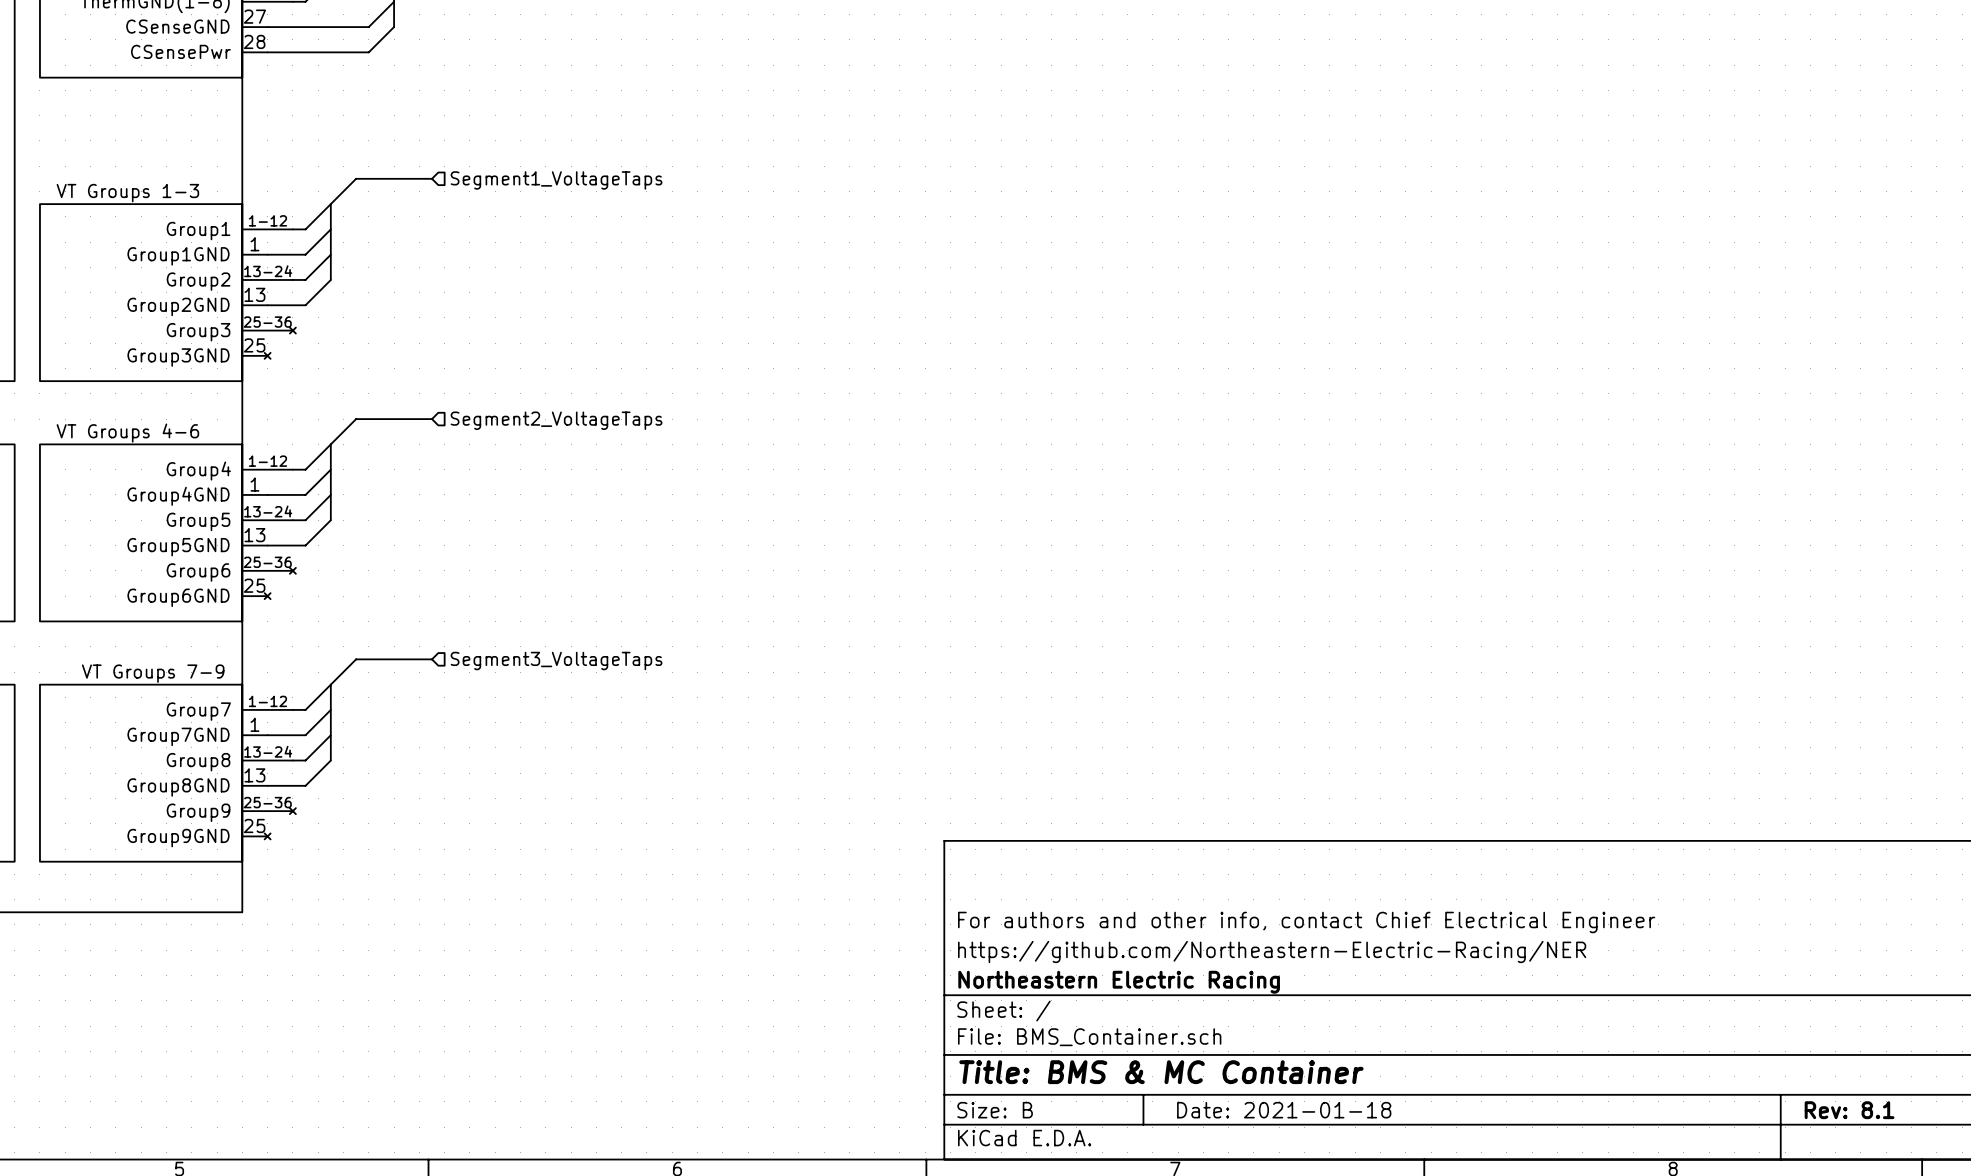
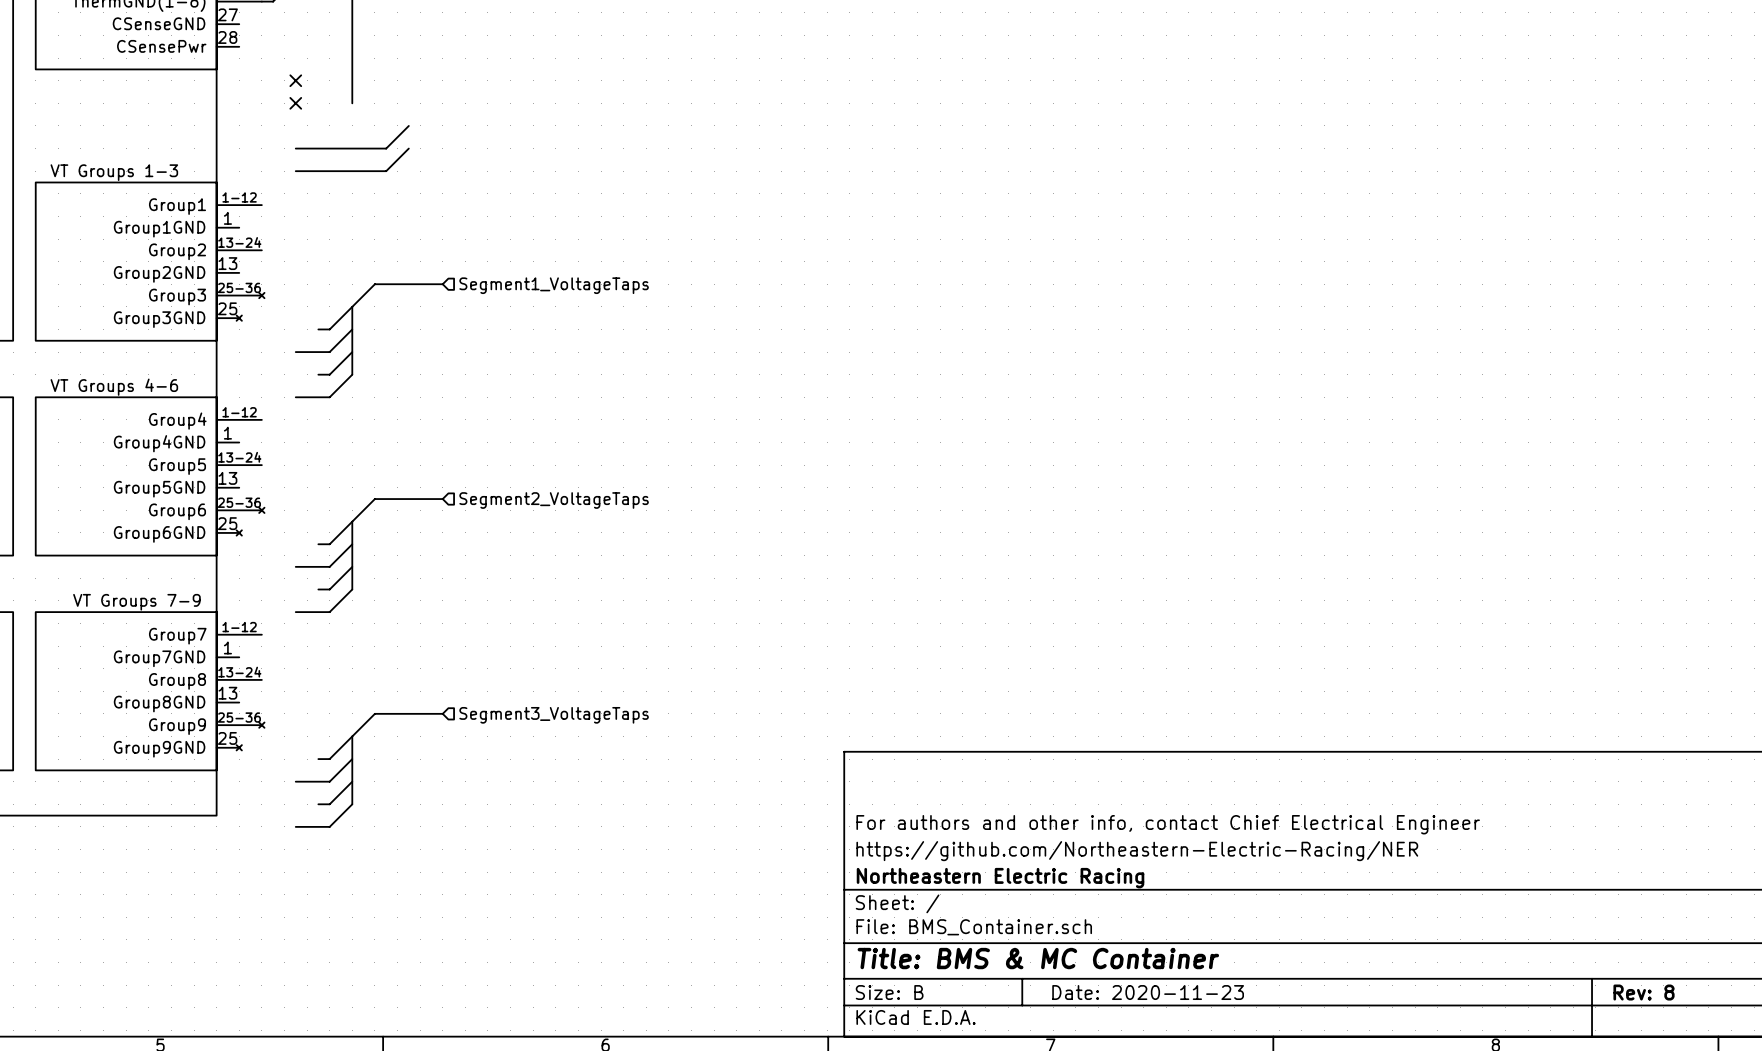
wire: (394, 1) (368, 27) (267, 27) -> (408, 125) (386, 148) (295, 148)
wire: (394, 27) (368, 52) (267, 52) -> (408, 148) (386, 171) (295, 171)
bus: none -> (352, 24) (352, 103)
no-connect mark: none -> (295, 80)
no-connect mark: none -> (295, 103)
bus: (432, 178) (356, 178) (330, 204) (330, 279) -> (442, 284) (374, 284) (352, 306) (352, 374)
hierarchical label position: Segment1_VoltageTaps (556, 180) -> Segment1_VoltageTaps (554, 285)
wire: (330, 204) (305, 229) (292, 229) -> (352, 306) (329, 329) (318, 329)
wire: (330, 229) (305, 254) (267, 254) -> (352, 329) (329, 352) (295, 352)
wire: (330, 254) (305, 279) (292, 279) -> (352, 352) (329, 374) (318, 374)
wire: (330, 279) (305, 305) (267, 305) -> none
bus: (432, 419) (356, 419) (330, 444) (330, 520) -> (442, 499) (374, 499) (352, 521) (352, 589)
hierarchical label position: Segment2_VoltageTaps (556, 420) -> Segment2_VoltageTaps (554, 500)
wire: (330, 444) (305, 469) (292, 469) -> (295, 397) (329, 397) (352, 374)
wire: (330, 469) (305, 494) (267, 494) -> (352, 544) (329, 566) (295, 566)
wire: (330, 494) (305, 520) (292, 520) -> (352, 566) (329, 589) (318, 589)
wire: (330, 520) (305, 545) (267, 545) -> none
wire: none -> (352, 521) (329, 544) (318, 544)
bus: (432, 659) (356, 659) (330, 684) (330, 760) -> (442, 713) (374, 713) (352, 736) (352, 804)
hierarchical label position: Segment3_VoltageTaps (556, 661) -> Segment3_VoltageTaps (554, 715)
wire: (330, 684) (305, 709) (292, 709) -> (295, 612) (329, 612) (352, 589)
wire: (330, 709) (305, 735) (267, 735) -> (352, 759) (329, 781) (295, 781)
wire: (330, 735) (305, 760) (292, 760) -> (352, 781) (329, 804) (318, 804)
wire: (330, 760) (305, 785) (267, 785) -> (352, 804) (329, 826) (295, 826)
wire: none -> (352, 736) (329, 759) (318, 759)
title block: Date: 2021-01-18 (1284, 1110) -> Date: 2020-11-23 (1148, 992)
title block: Rev: 8.1 (1849, 1110) -> Rev: 8 (1644, 992)

